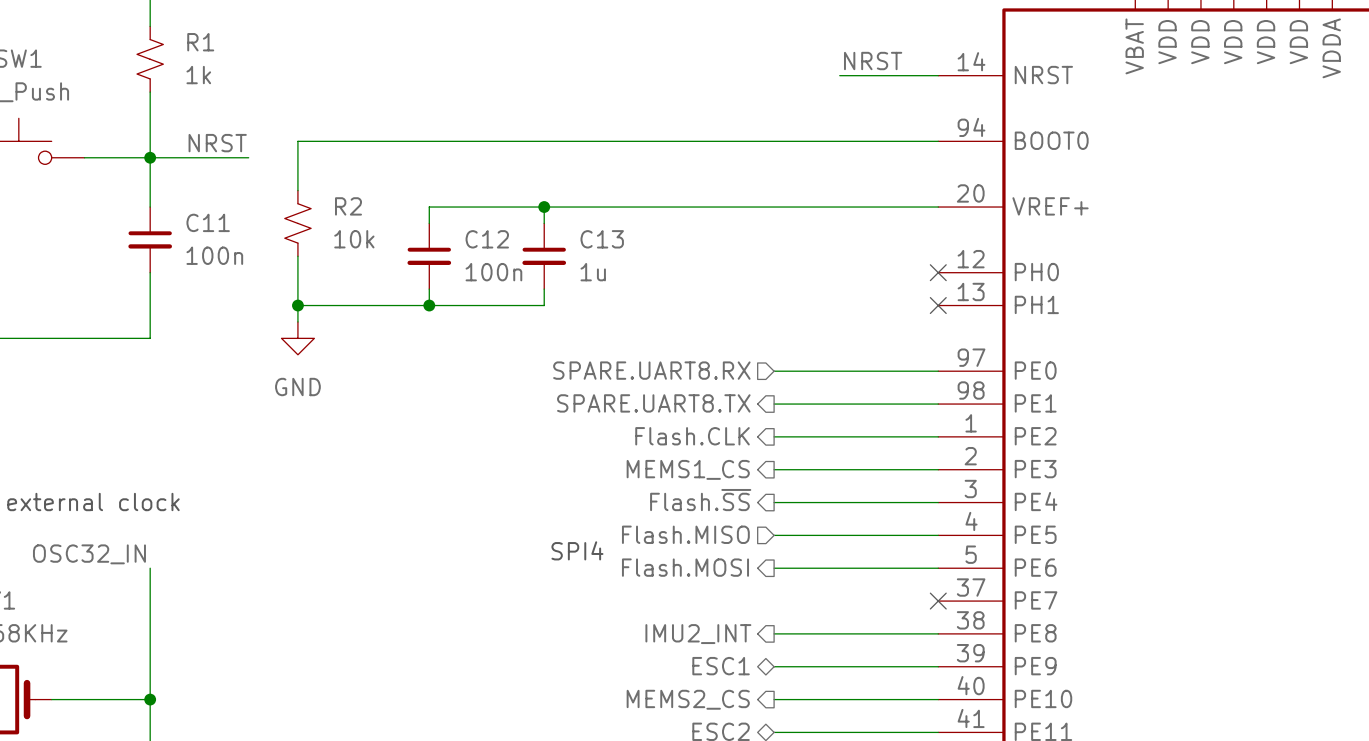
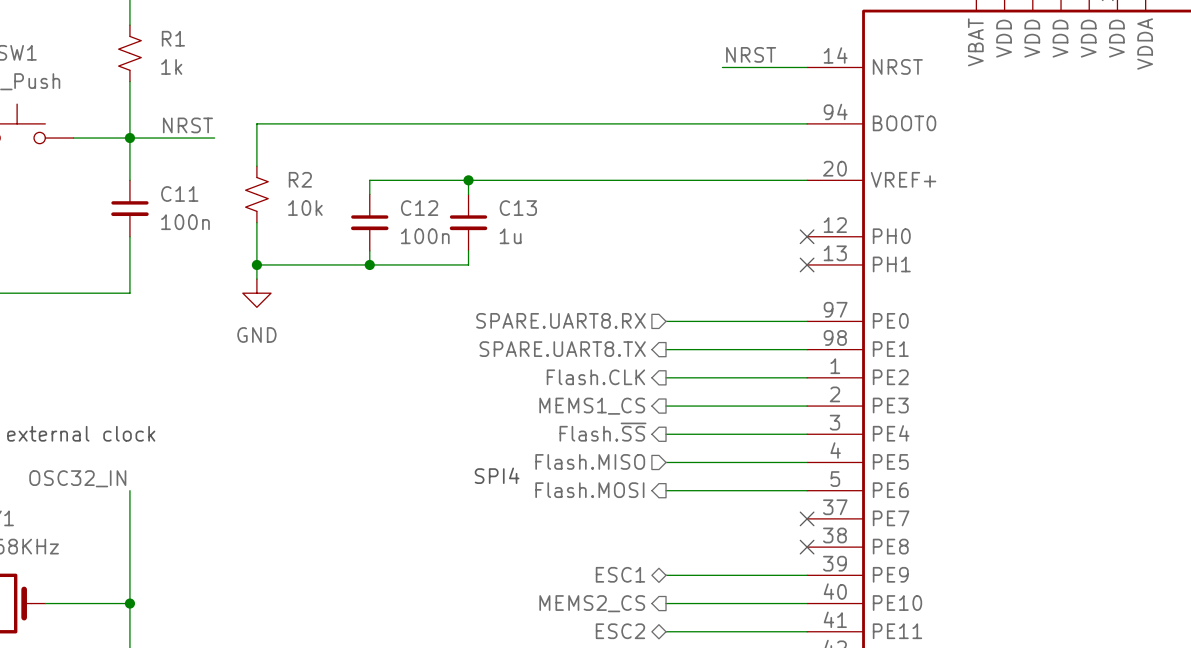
wire: (774, 633) (938, 633) -> none
no-connect mark: none -> (807, 547)
hierarchical label: IMU2_INT (698, 634) -> none

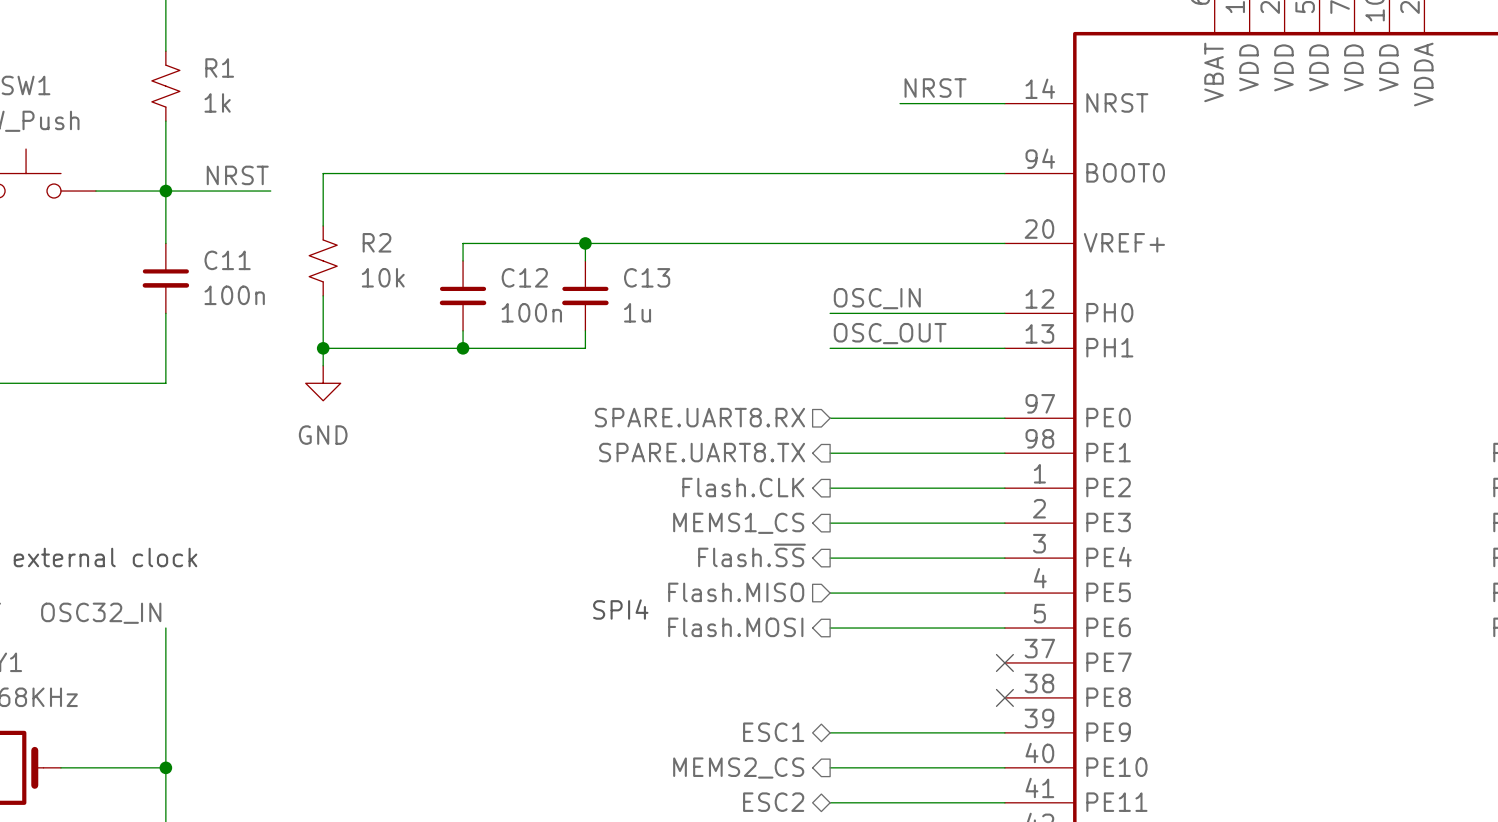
label: none -> OSC_IN (877, 298)
wire: none -> (830, 313) (1004, 313)
no-connect mark: (807, 236) -> none
label: none -> OSC_OUT (890, 333)
wire: none -> (830, 348) (1004, 348)
no-connect mark: (807, 264) -> none

